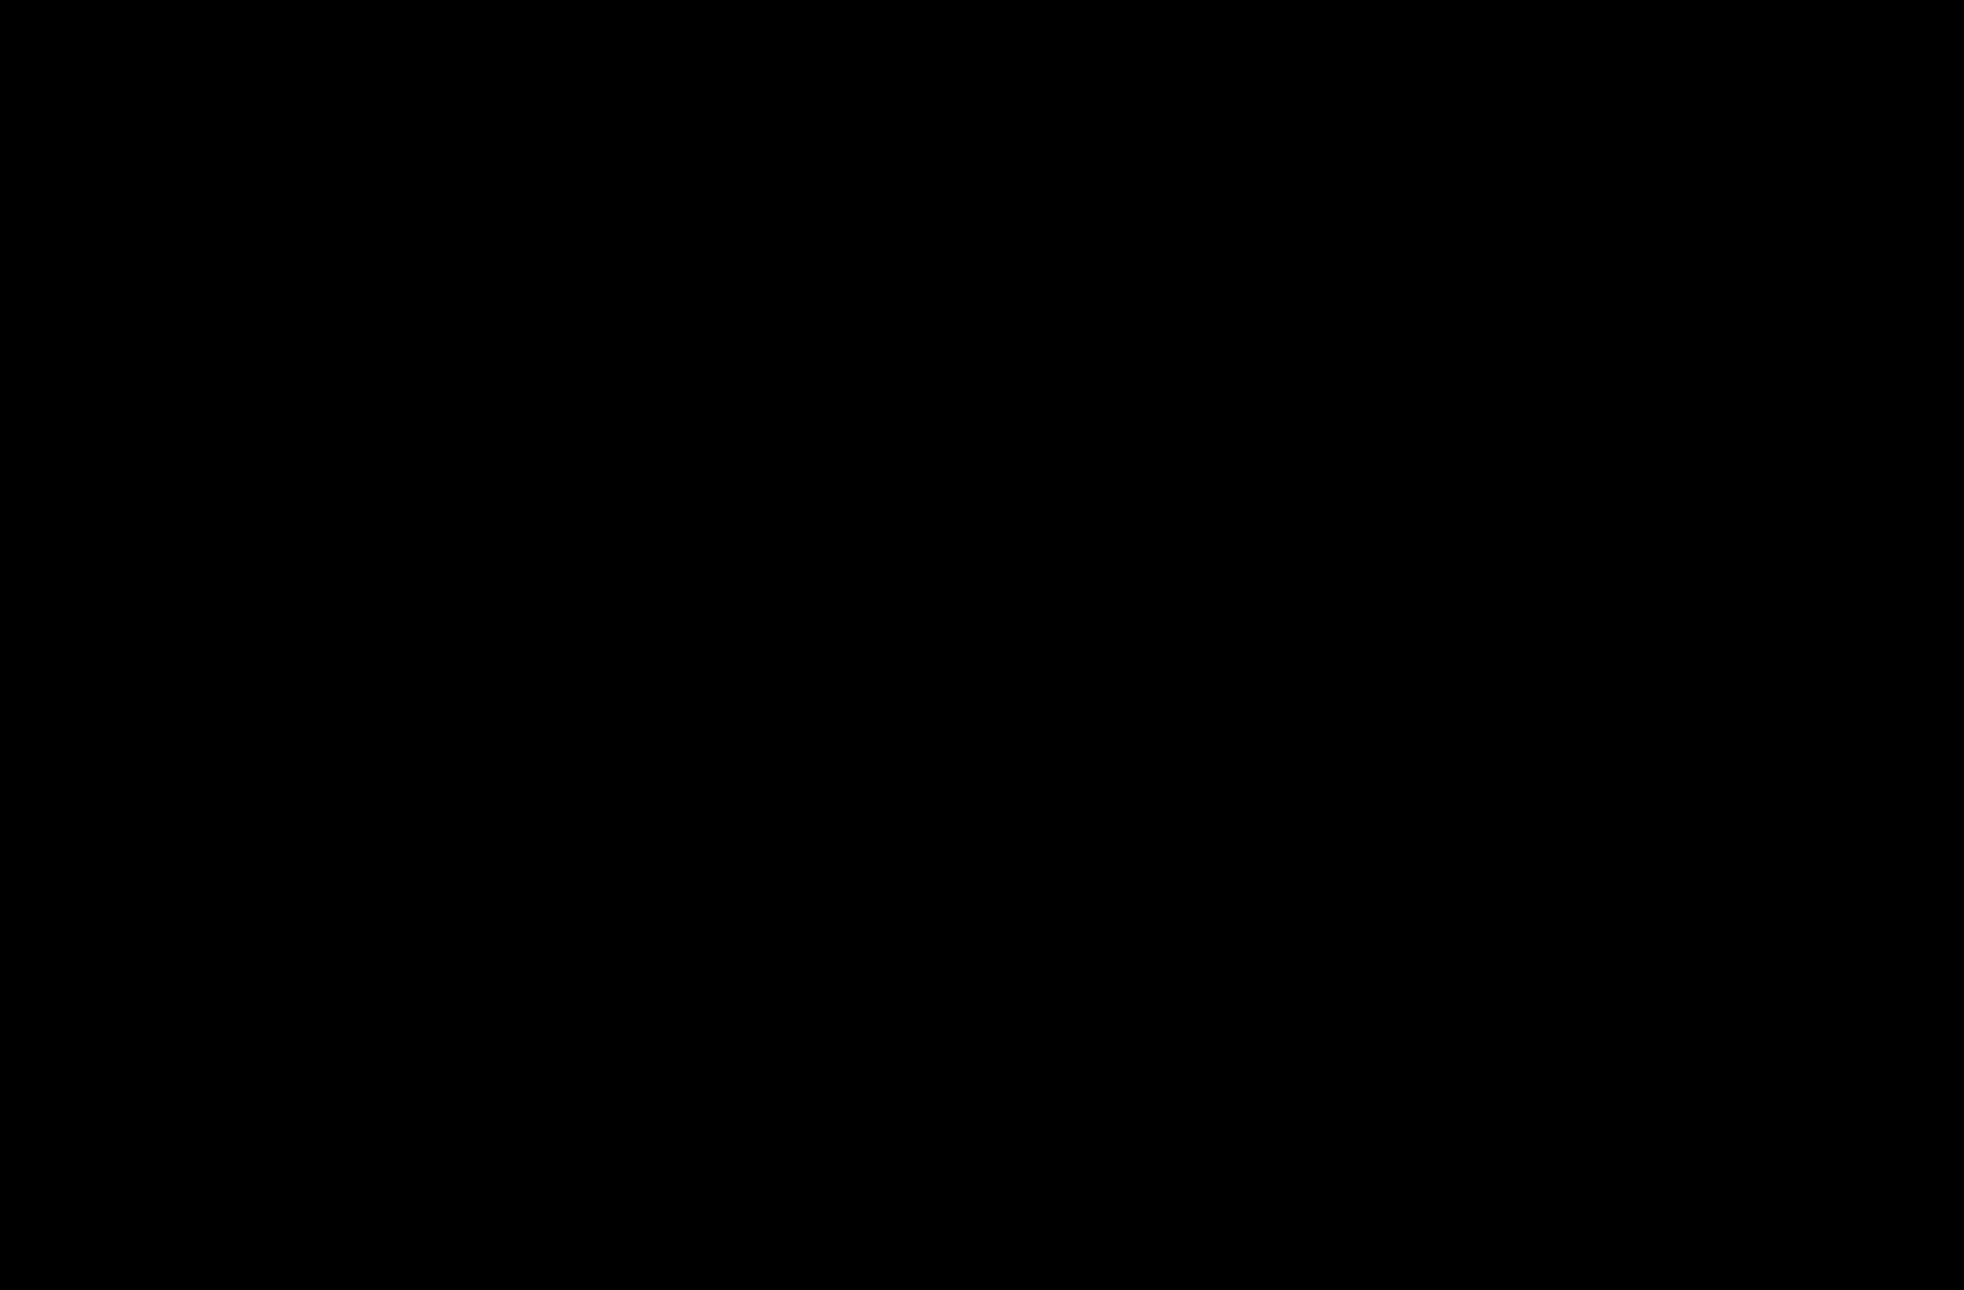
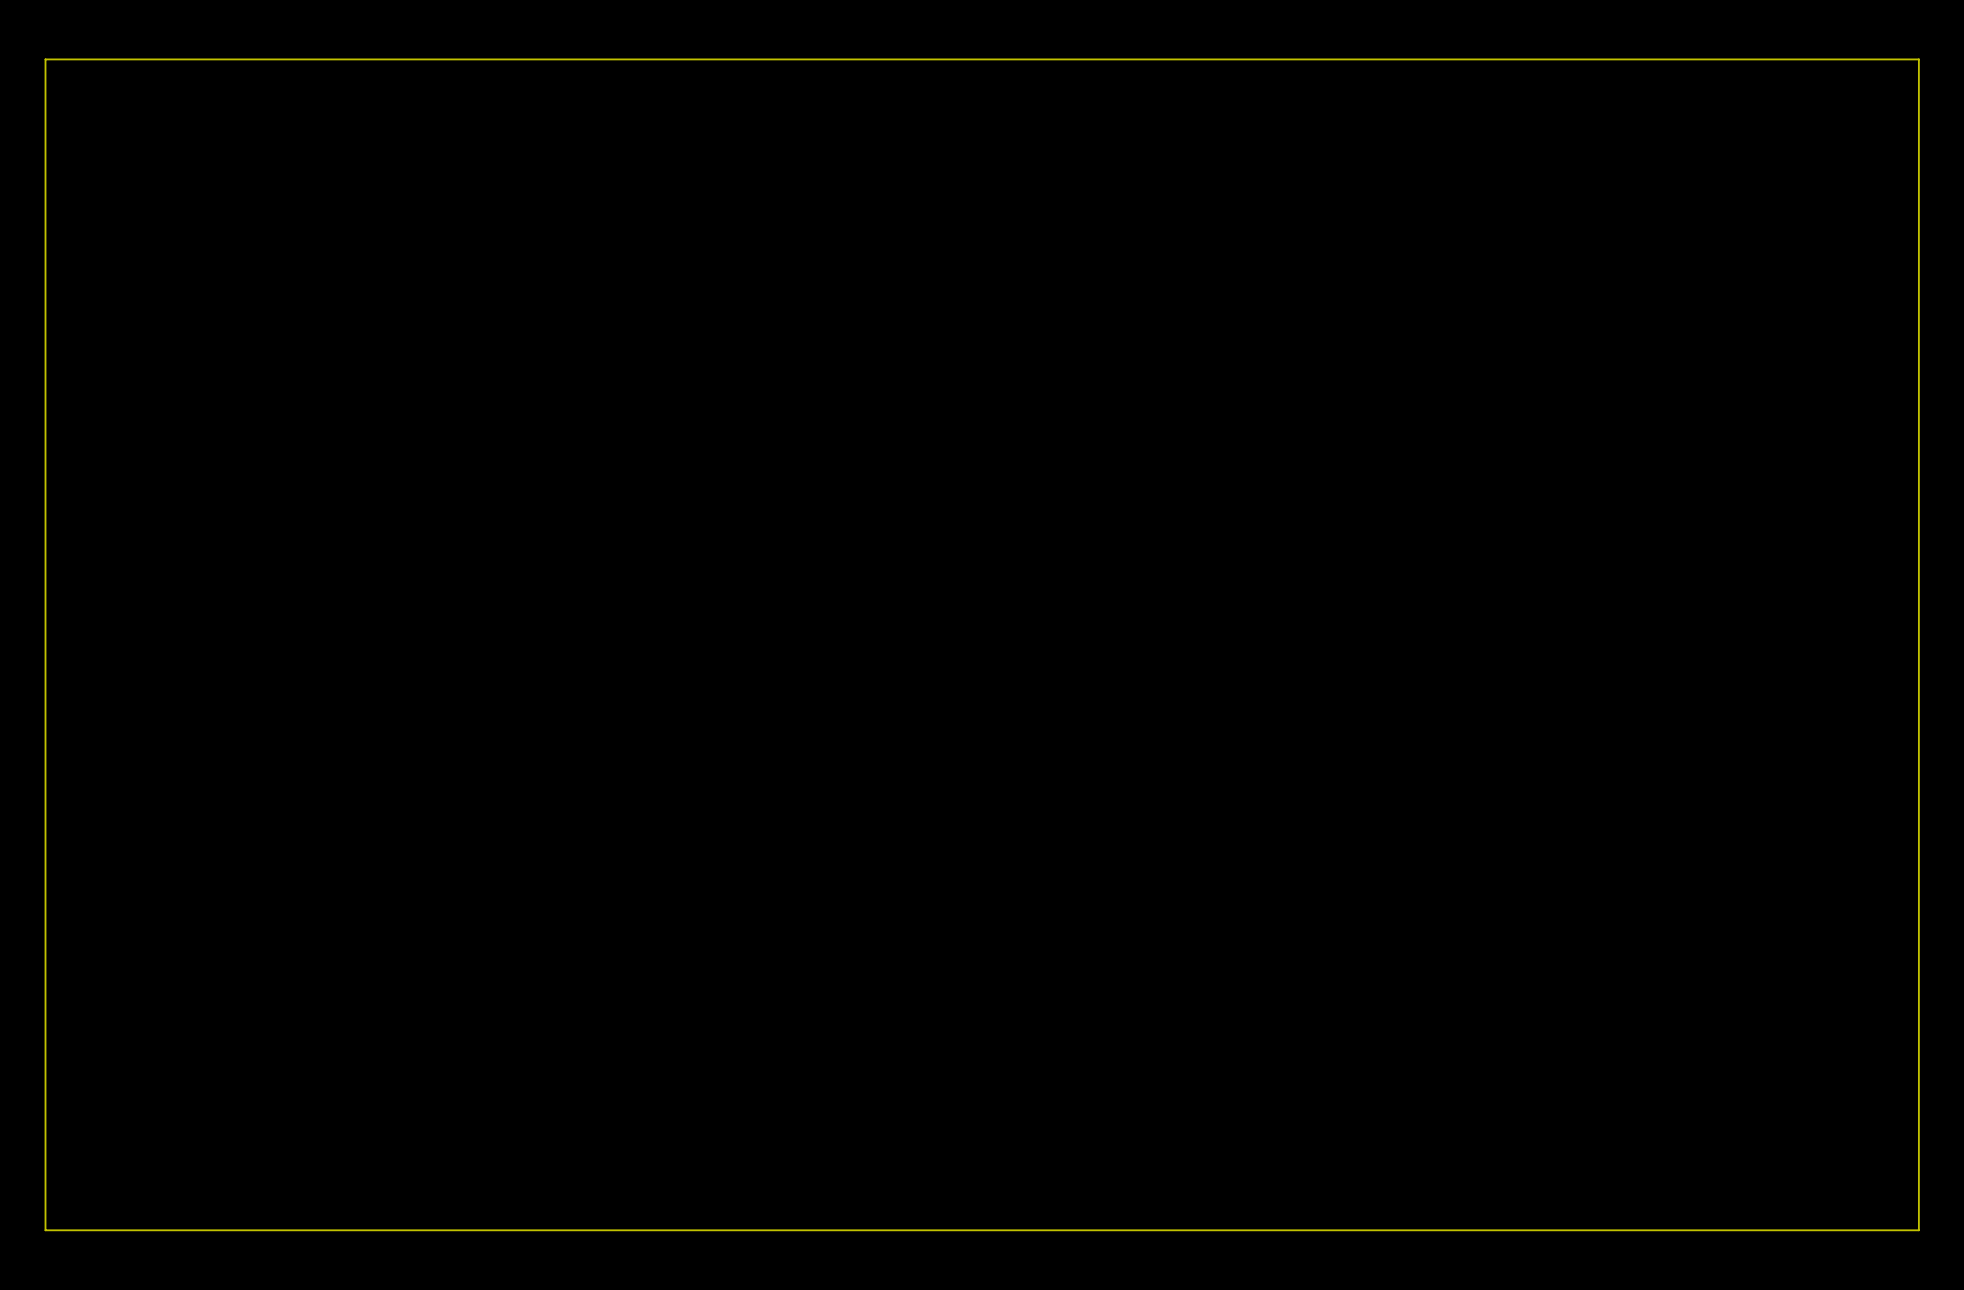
board edge: none -> (45, 59) (1918, 59) (1918, 1230) (45, 1230) (45, 59)

